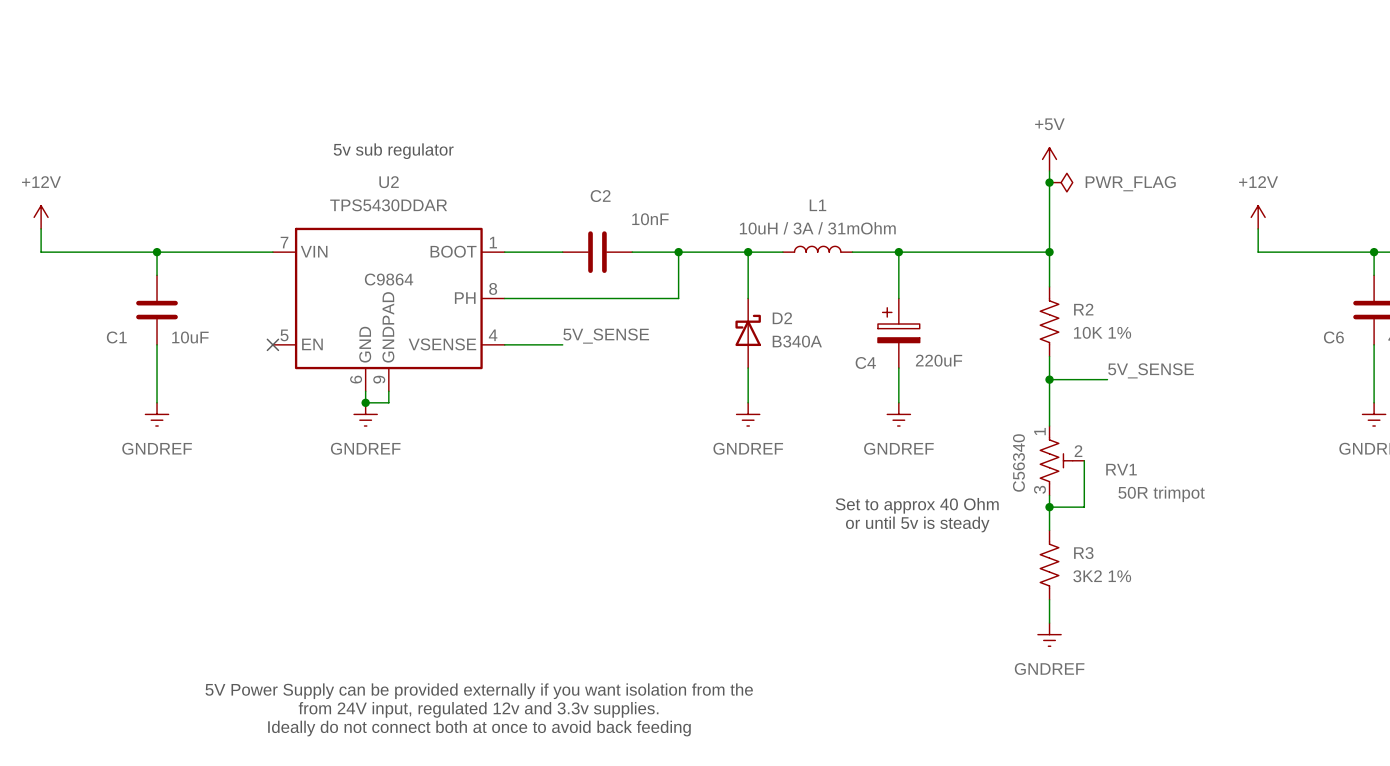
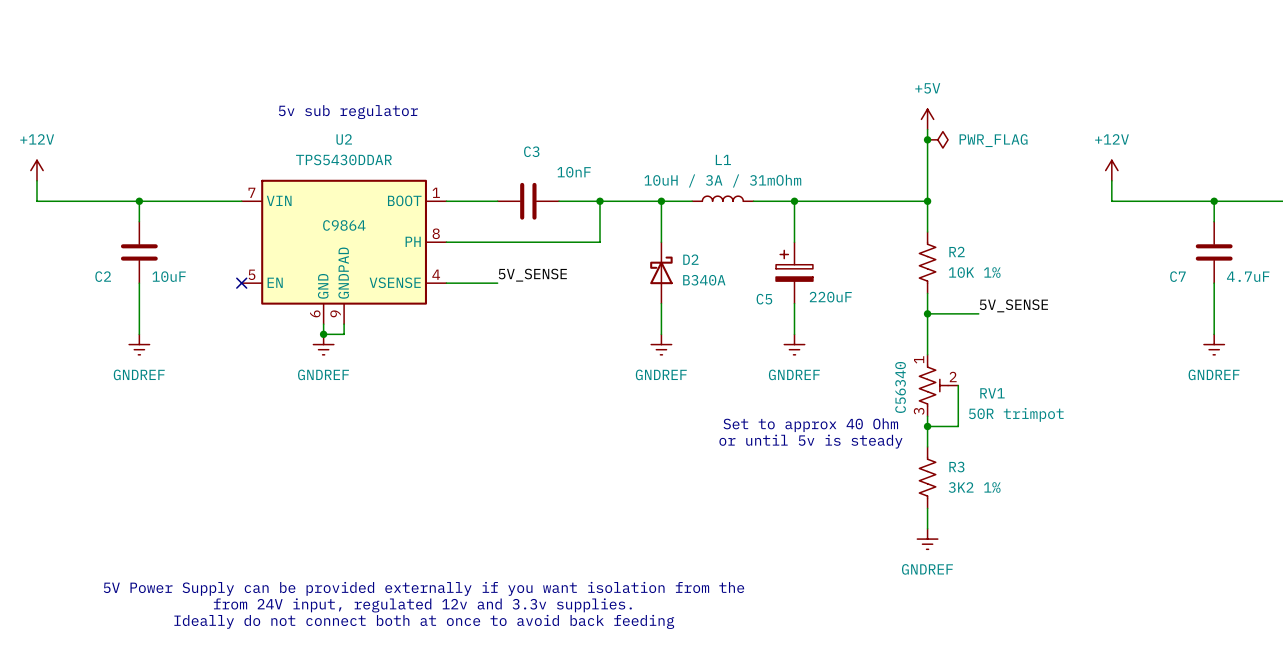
C2 name: C2 (600, 196) -> C3 (531, 151)
C1 name: C1 (116, 337) -> C2 (103, 276)
C6 name: C6 (1333, 337) -> C7 (1177, 276)
C4 name: C4 (865, 362) -> C5 (764, 299)

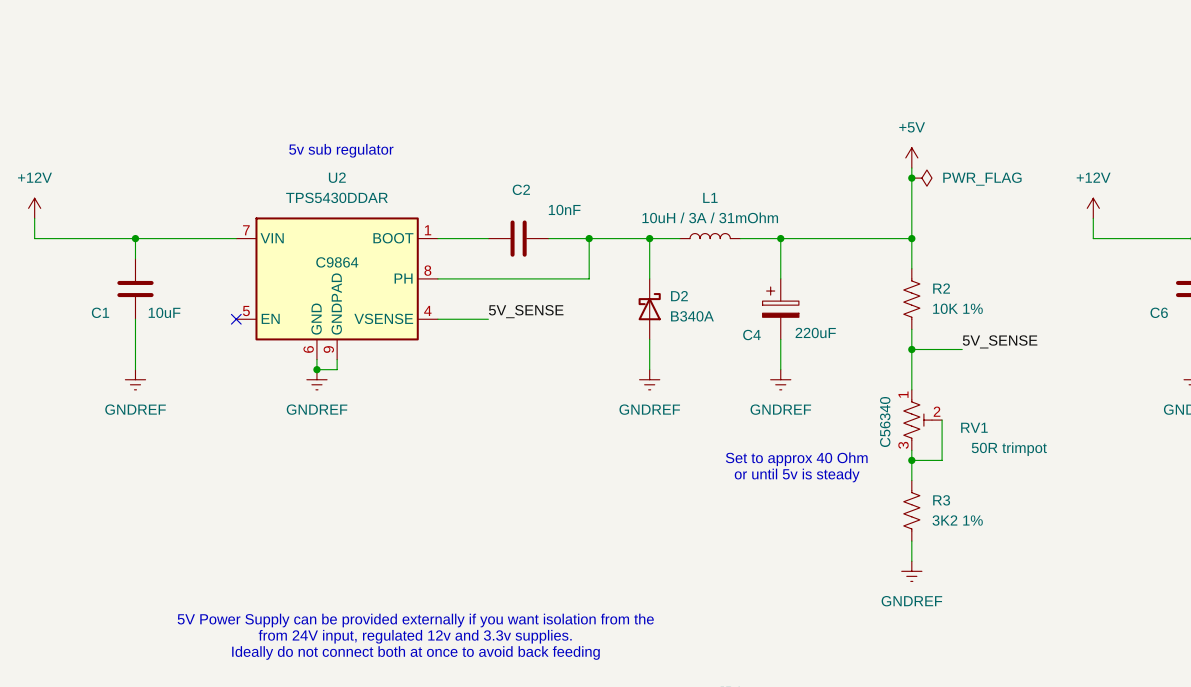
C3 name: C3 (531, 151) -> C2 (521, 189)
C2 name: C2 (103, 276) -> C1 (100, 312)
C7 name: C7 (1177, 276) -> C6 (1159, 312)
C5 name: C5 (764, 299) -> C4 (751, 335)

